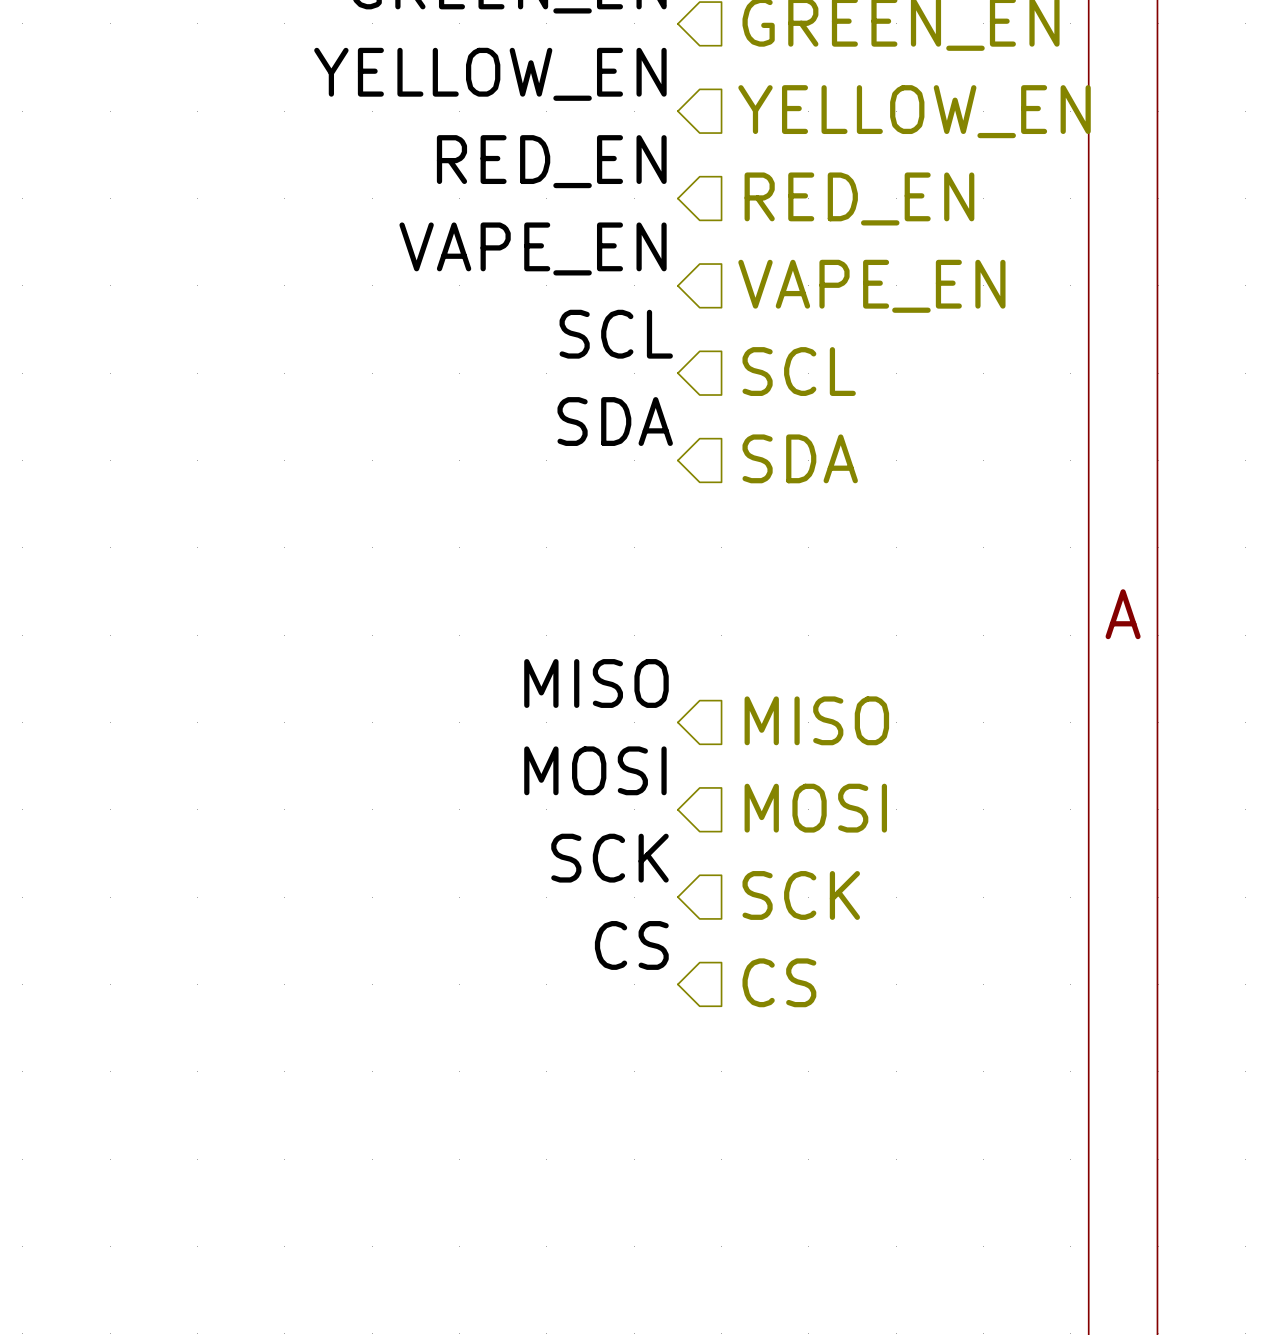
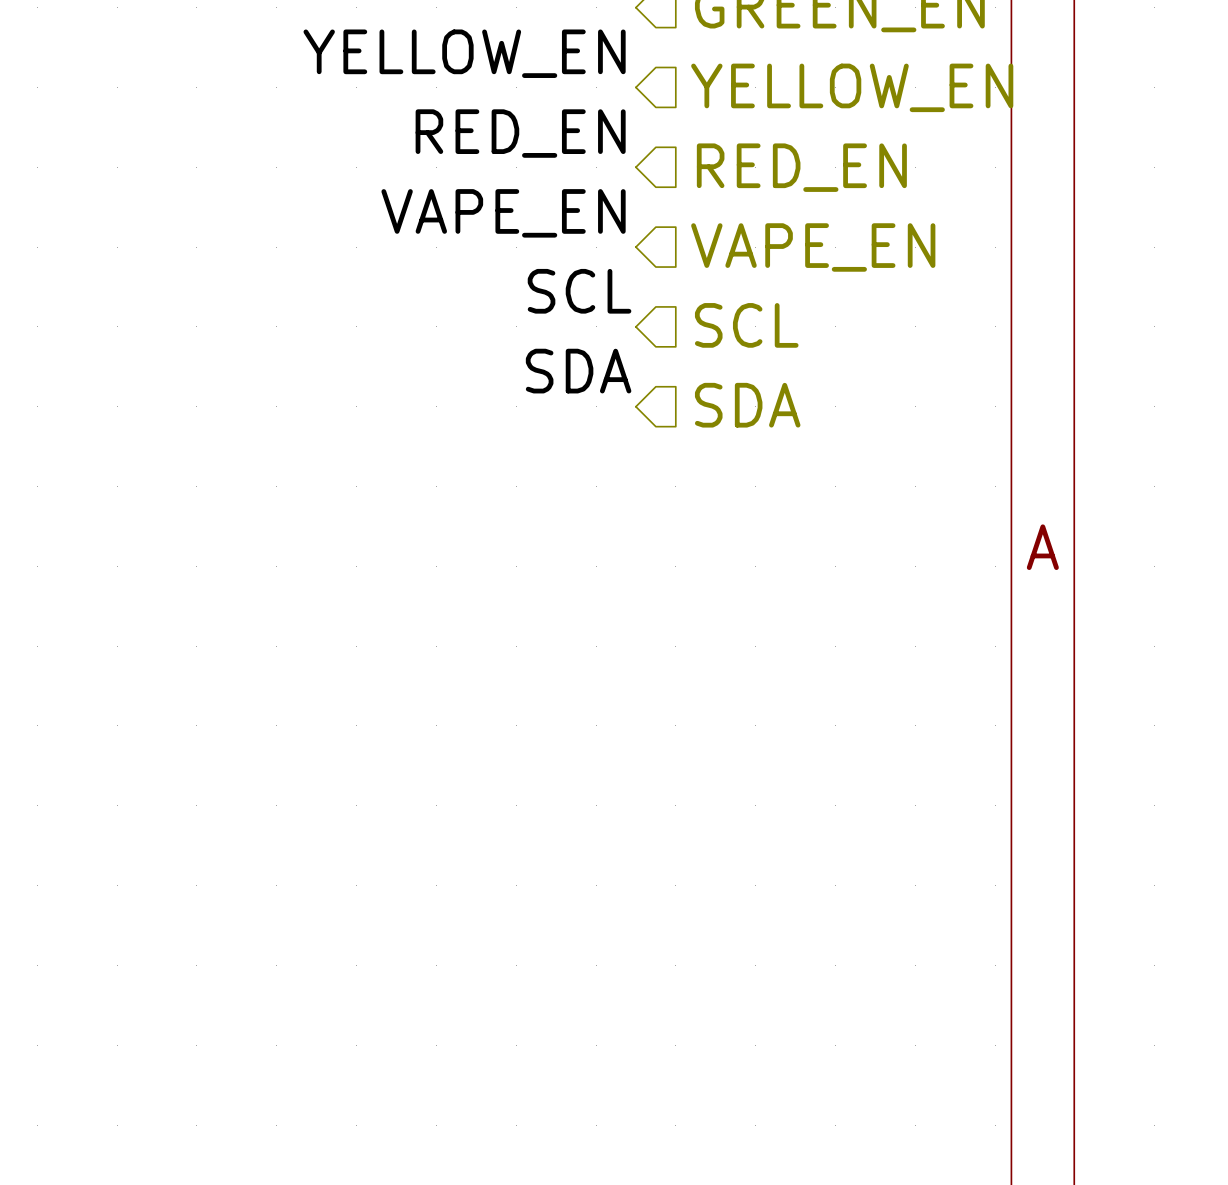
label: MISO (596, 683) -> none
hierarchical label: MISO (816, 720) -> none
label: MOSI (595, 770) -> none
hierarchical label: MOSI (815, 808) -> none
label: SCK (609, 858) -> none
hierarchical label: SCK (801, 895) -> none
label: CS (631, 945) -> none
hierarchical label: CS (779, 982) -> none

